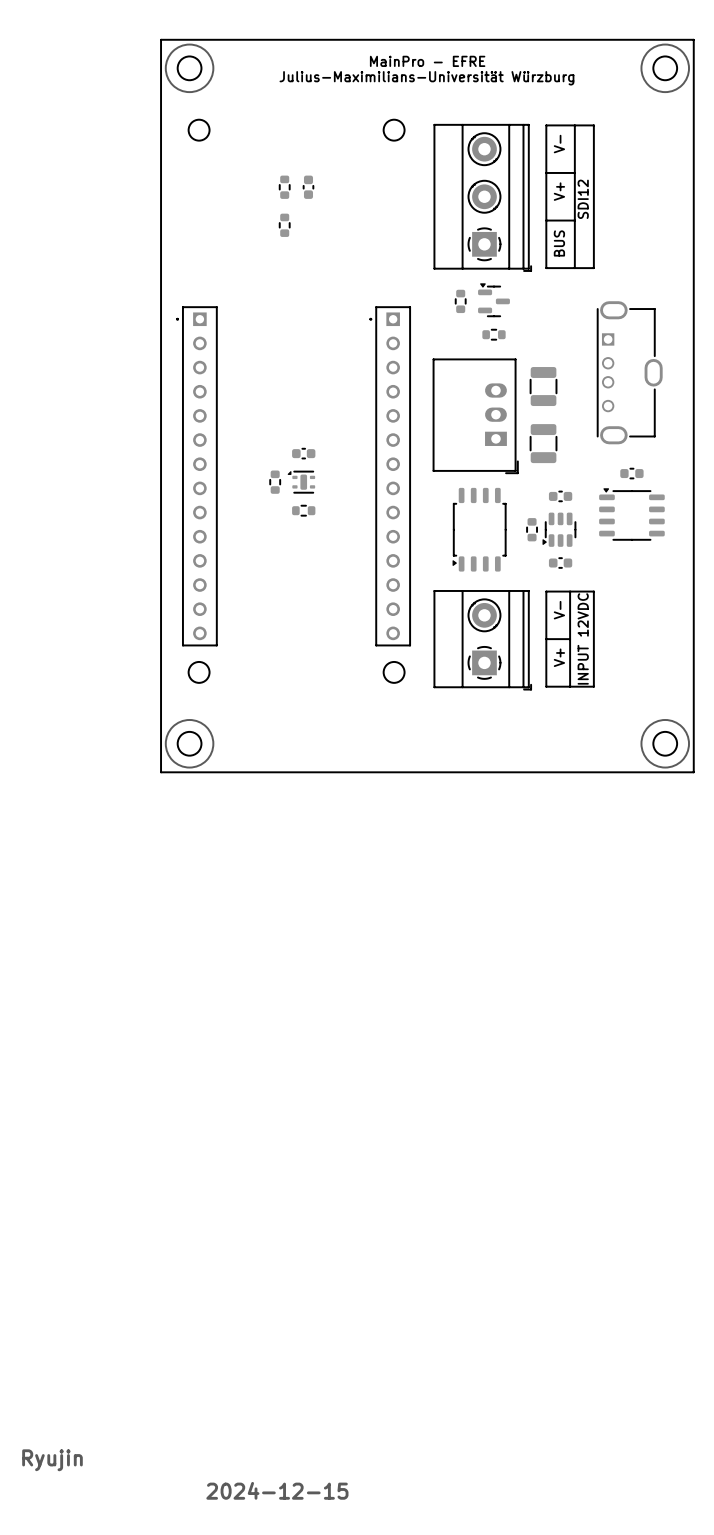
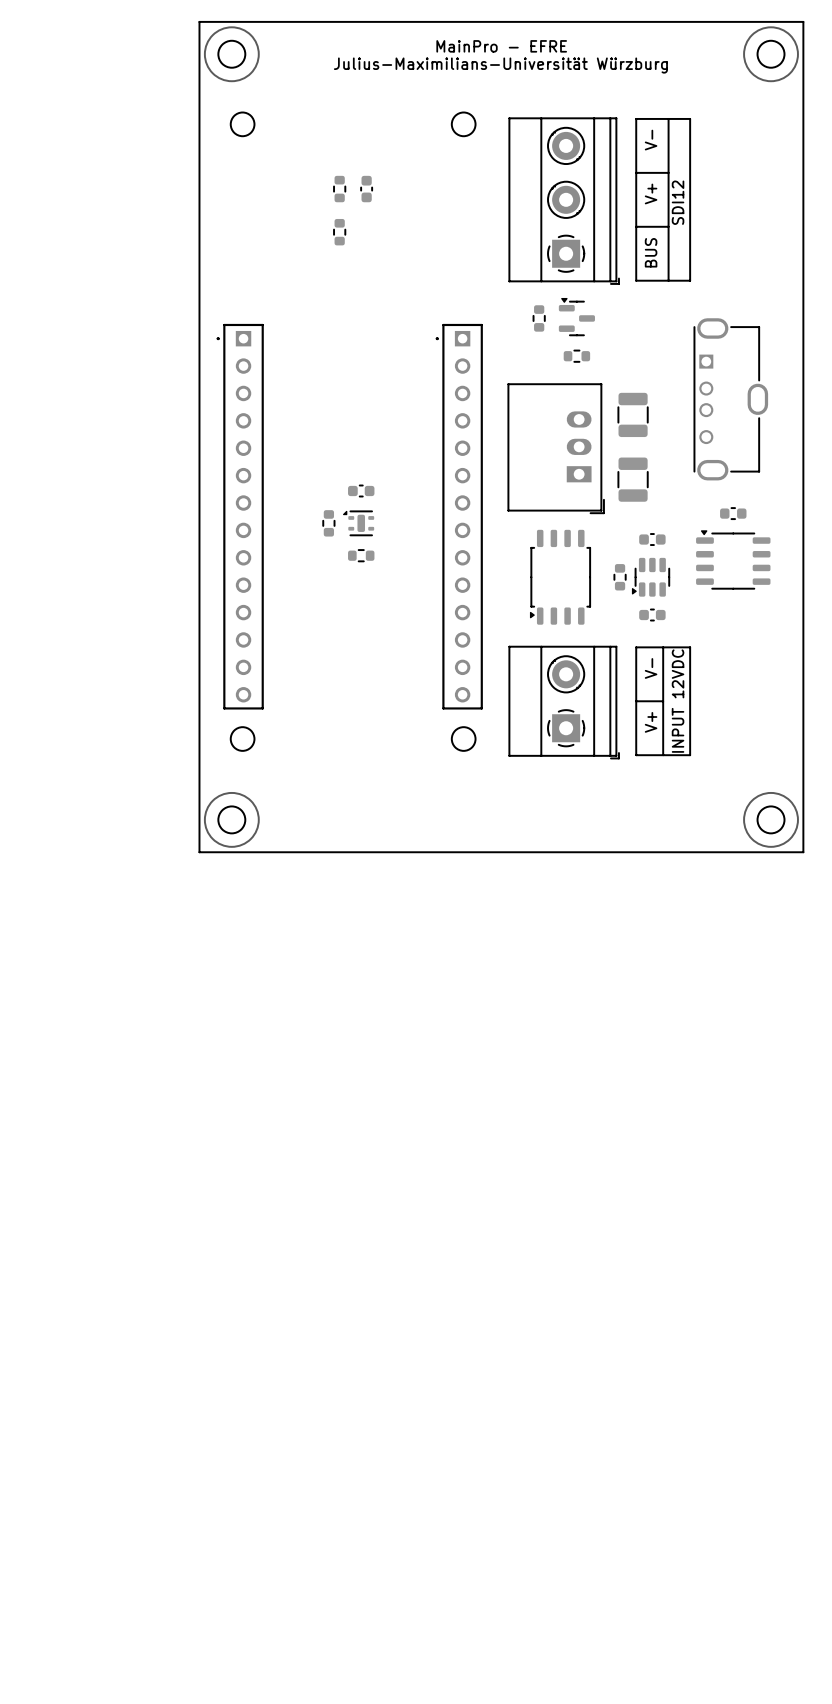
text: Ryujin (52, 1460) -> none
text: 2024-12-15 (277, 1490) -> none

